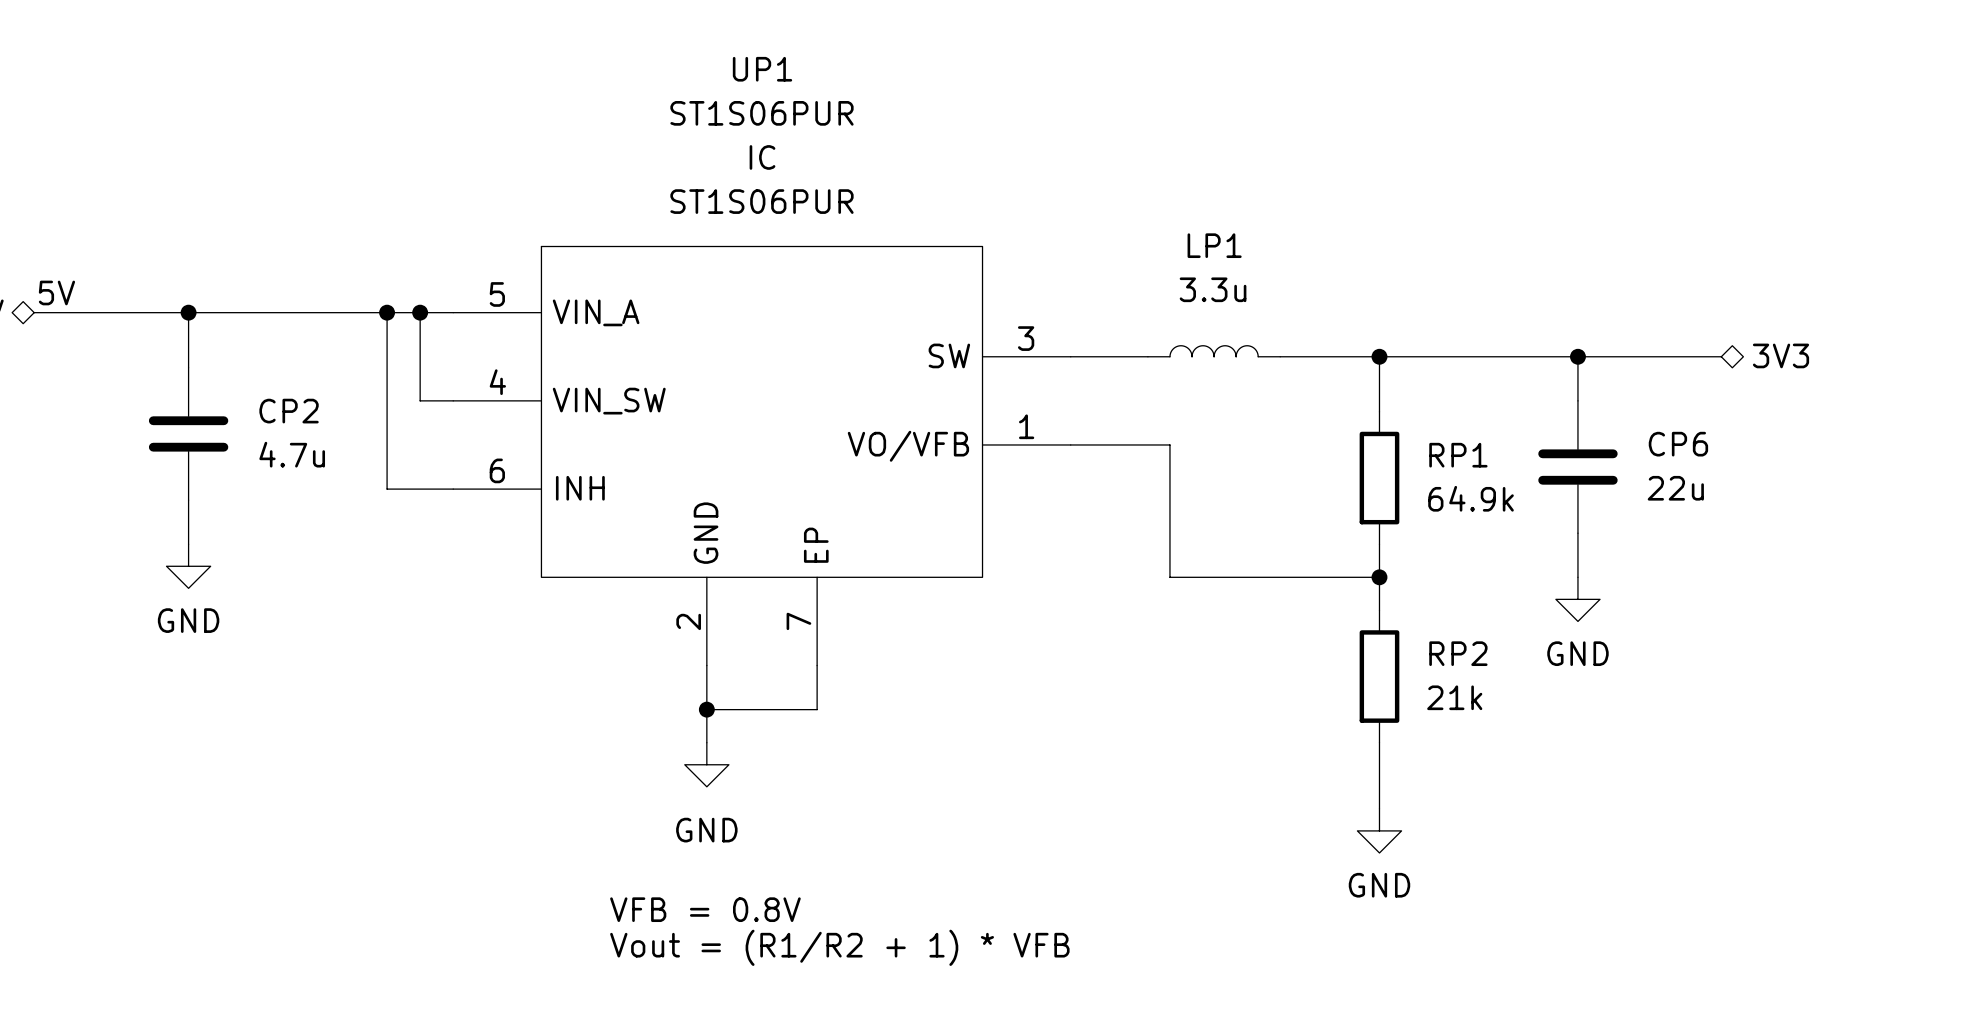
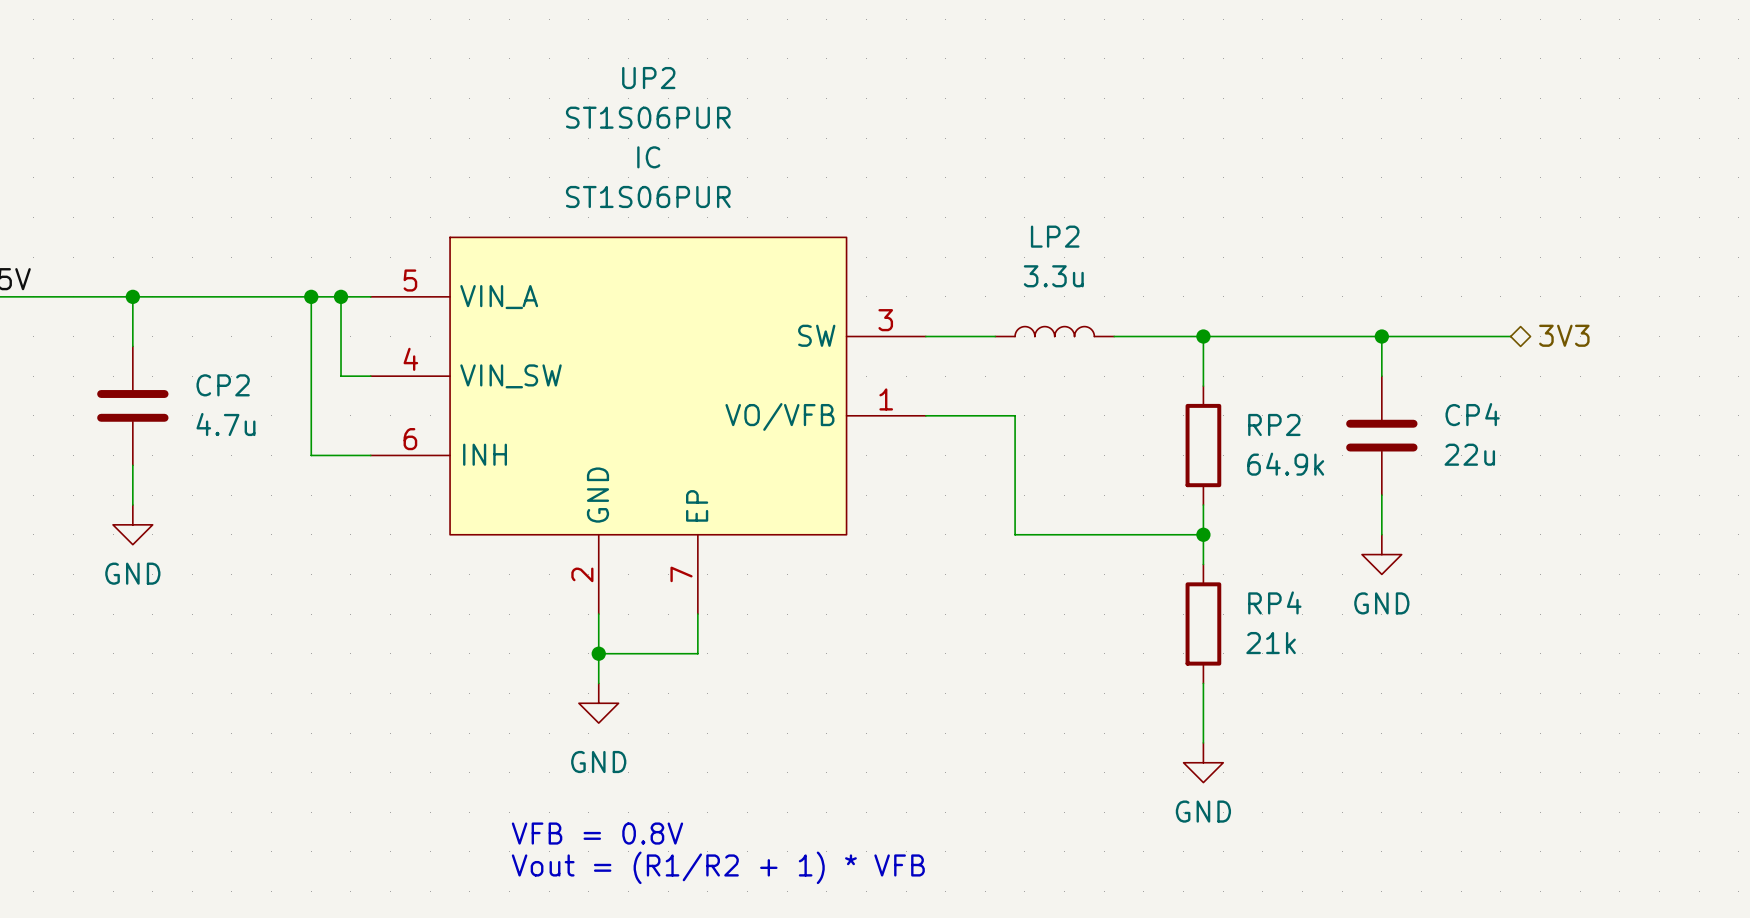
UP1 name: UP1 (762, 69) -> UP2 (648, 78)
LP1 name: LP1 (1214, 245) -> LP2 (1055, 236)
CP6 name: CP6 (1678, 444) -> CP4 (1472, 414)
RP1 name: RP1 (1458, 455) -> RP2 (1274, 424)
RP2 name: RP2 (1458, 653) -> RP4 (1274, 602)

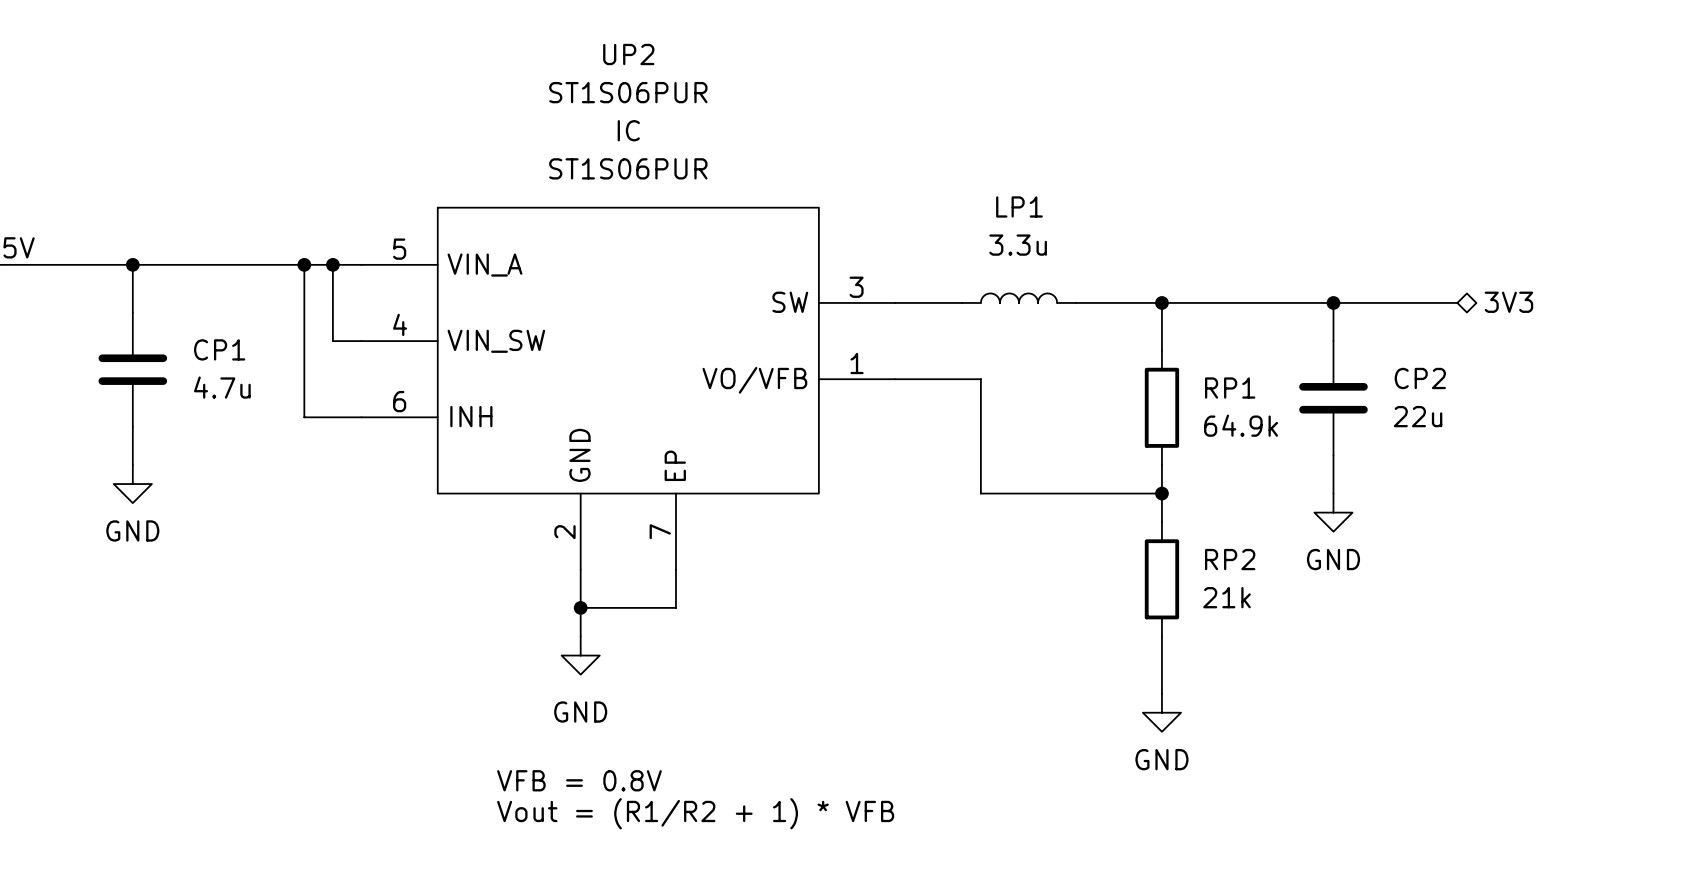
LP2 name: LP2 (1055, 236) -> LP1 (1019, 206)
CP2 name: CP2 (223, 385) -> CP1 (219, 349)
CP4 name: CP4 (1472, 414) -> CP2 (1420, 378)
RP2 name: RP2 (1274, 424) -> RP1 (1230, 388)
RP4 name: RP4 (1274, 602) -> RP2 (1230, 559)

